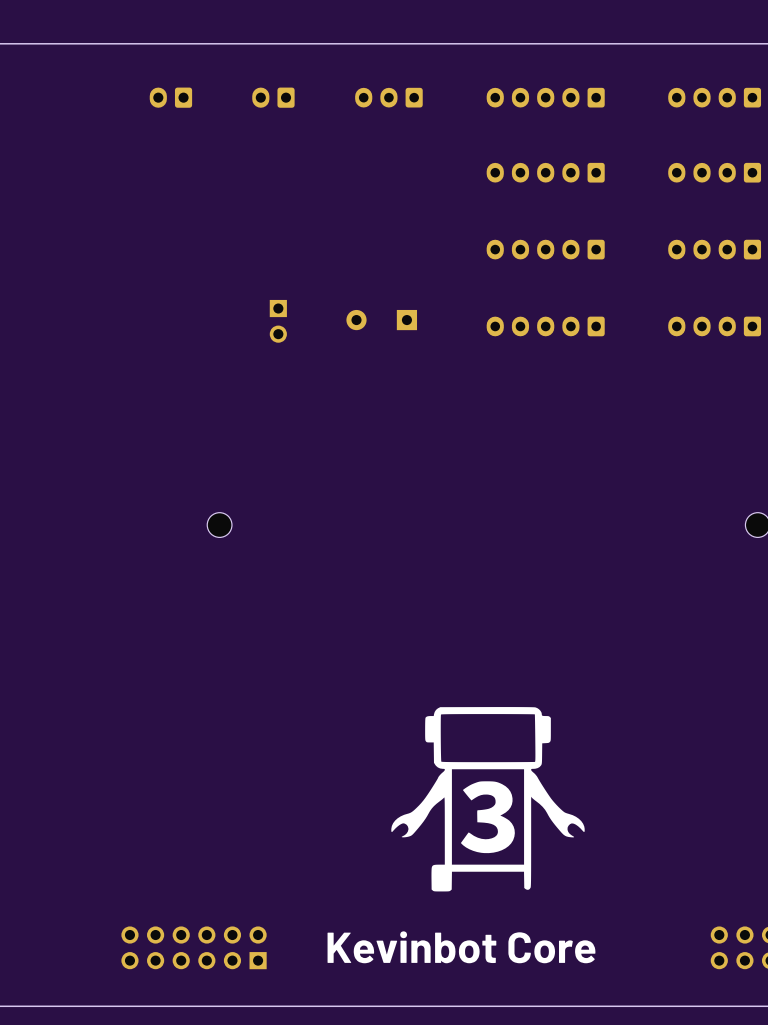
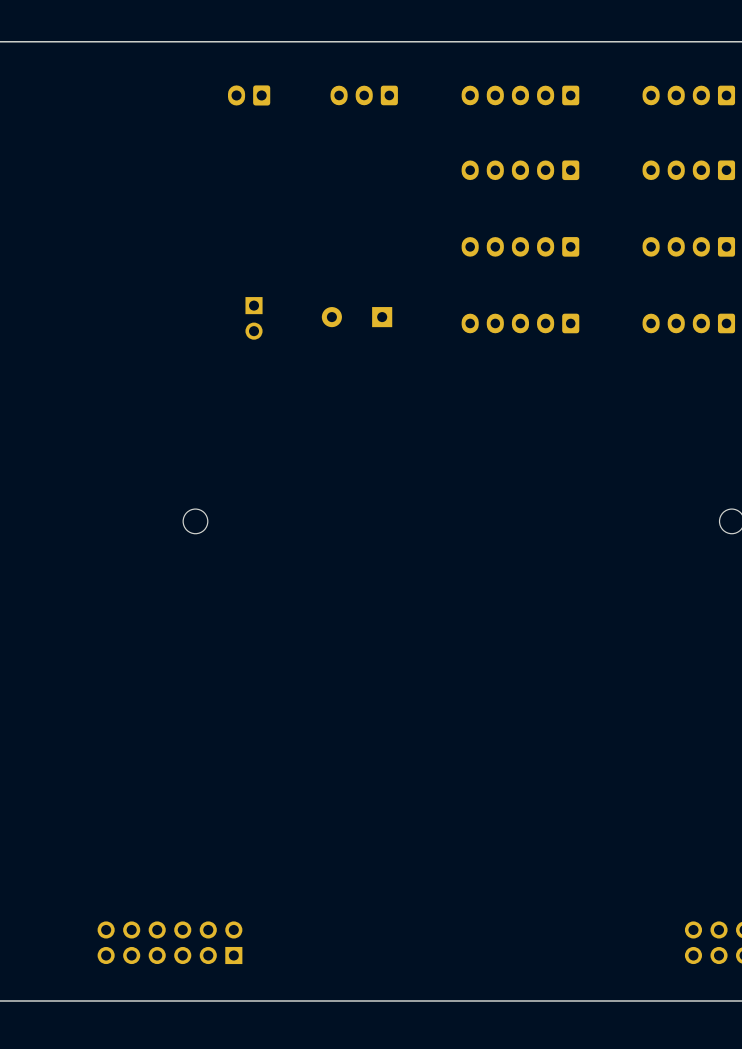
part: (170, 97) -> none
drawing: [391, 707, 585, 892] -> none
text: Kevinbot Core (461, 947) -> none

